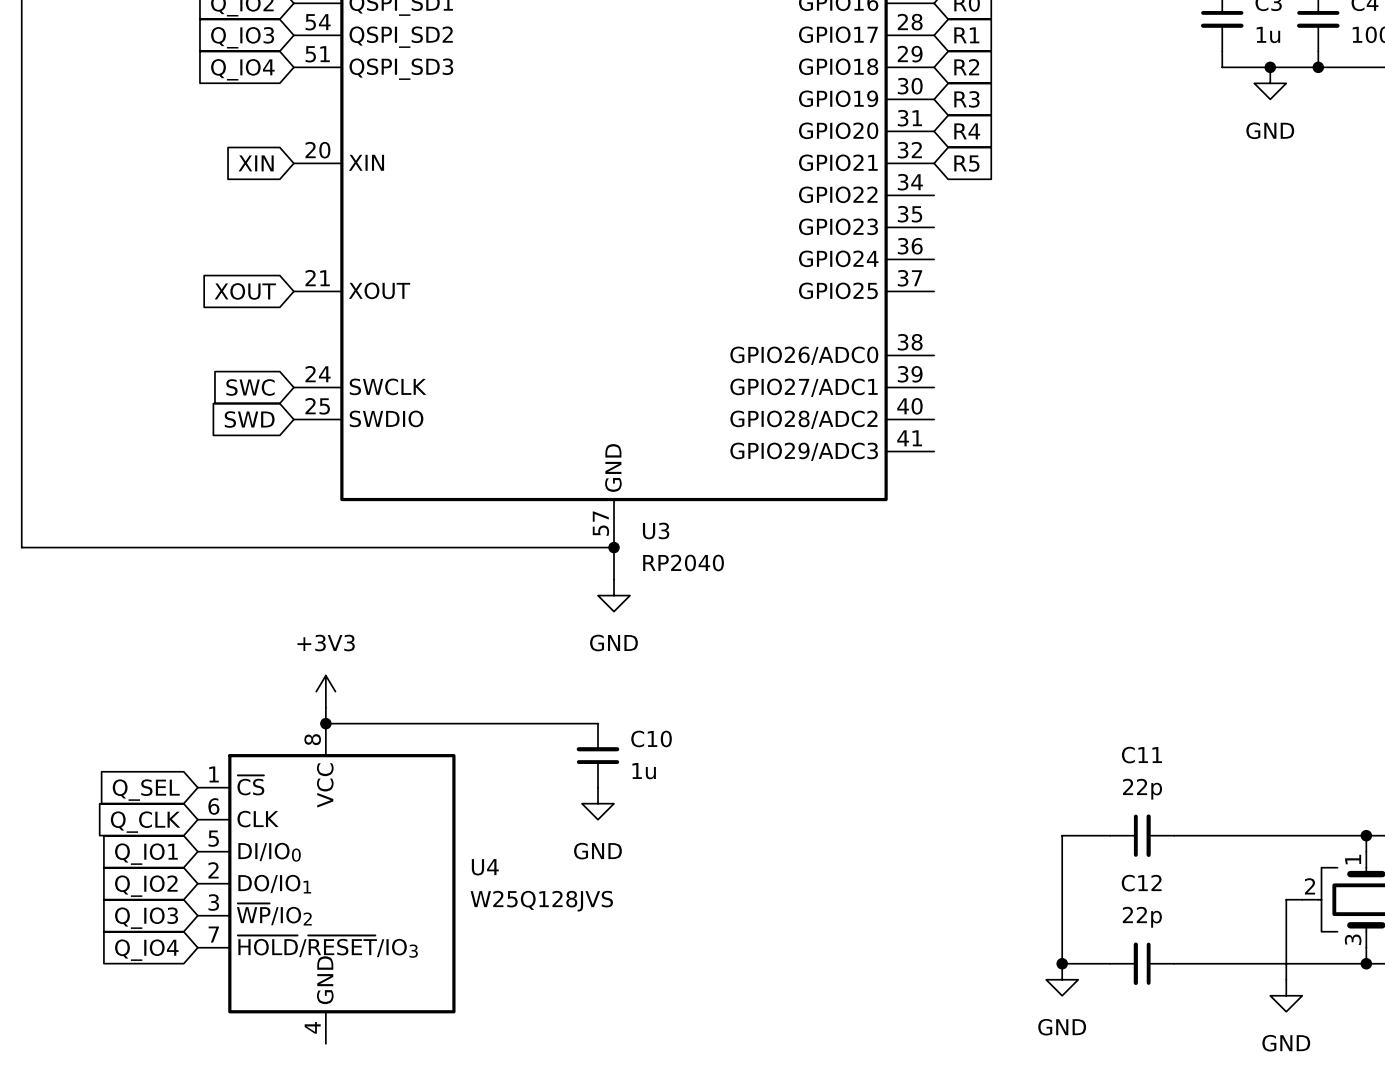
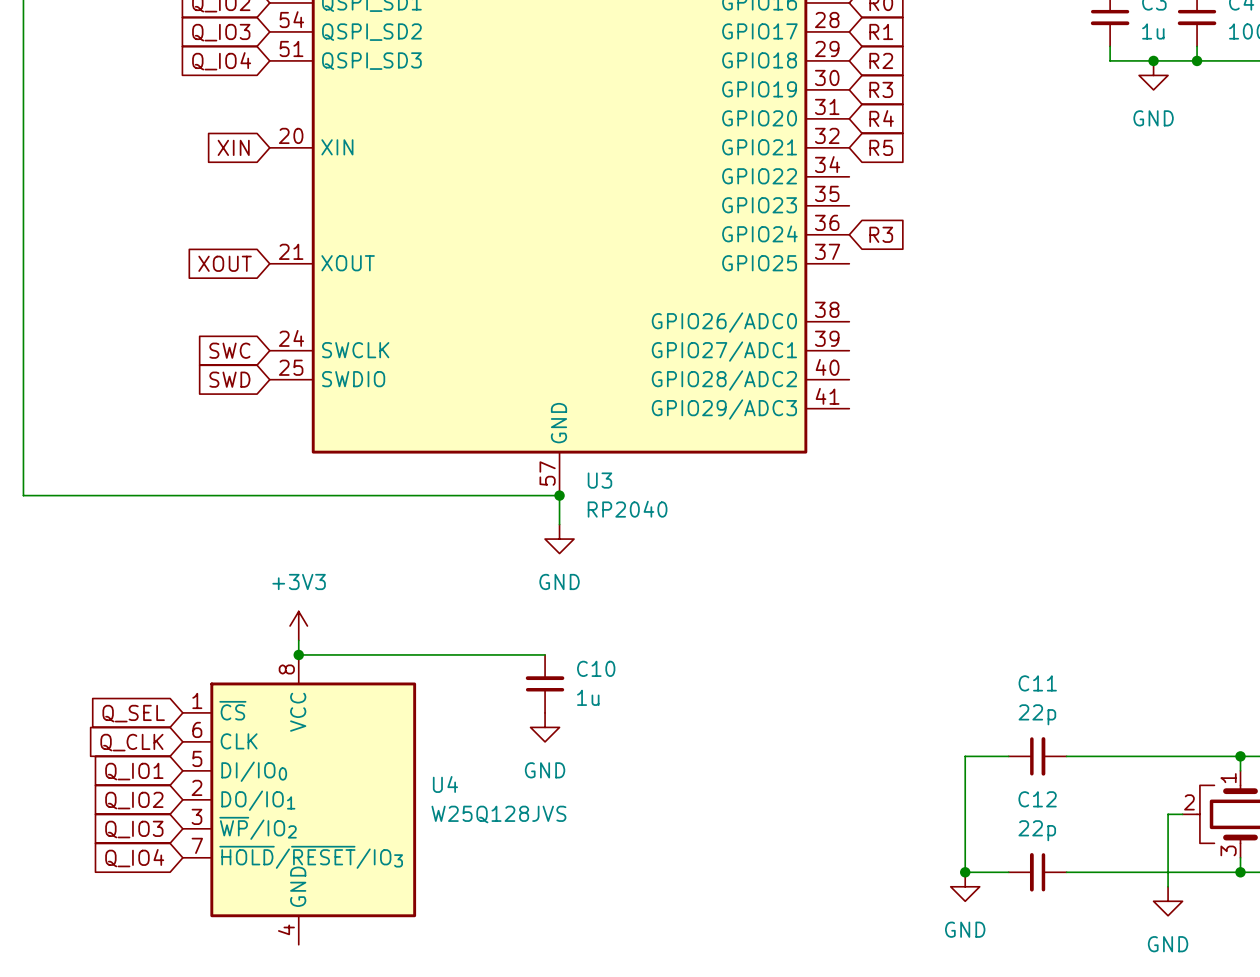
global label: none -> R3 (881, 234)

